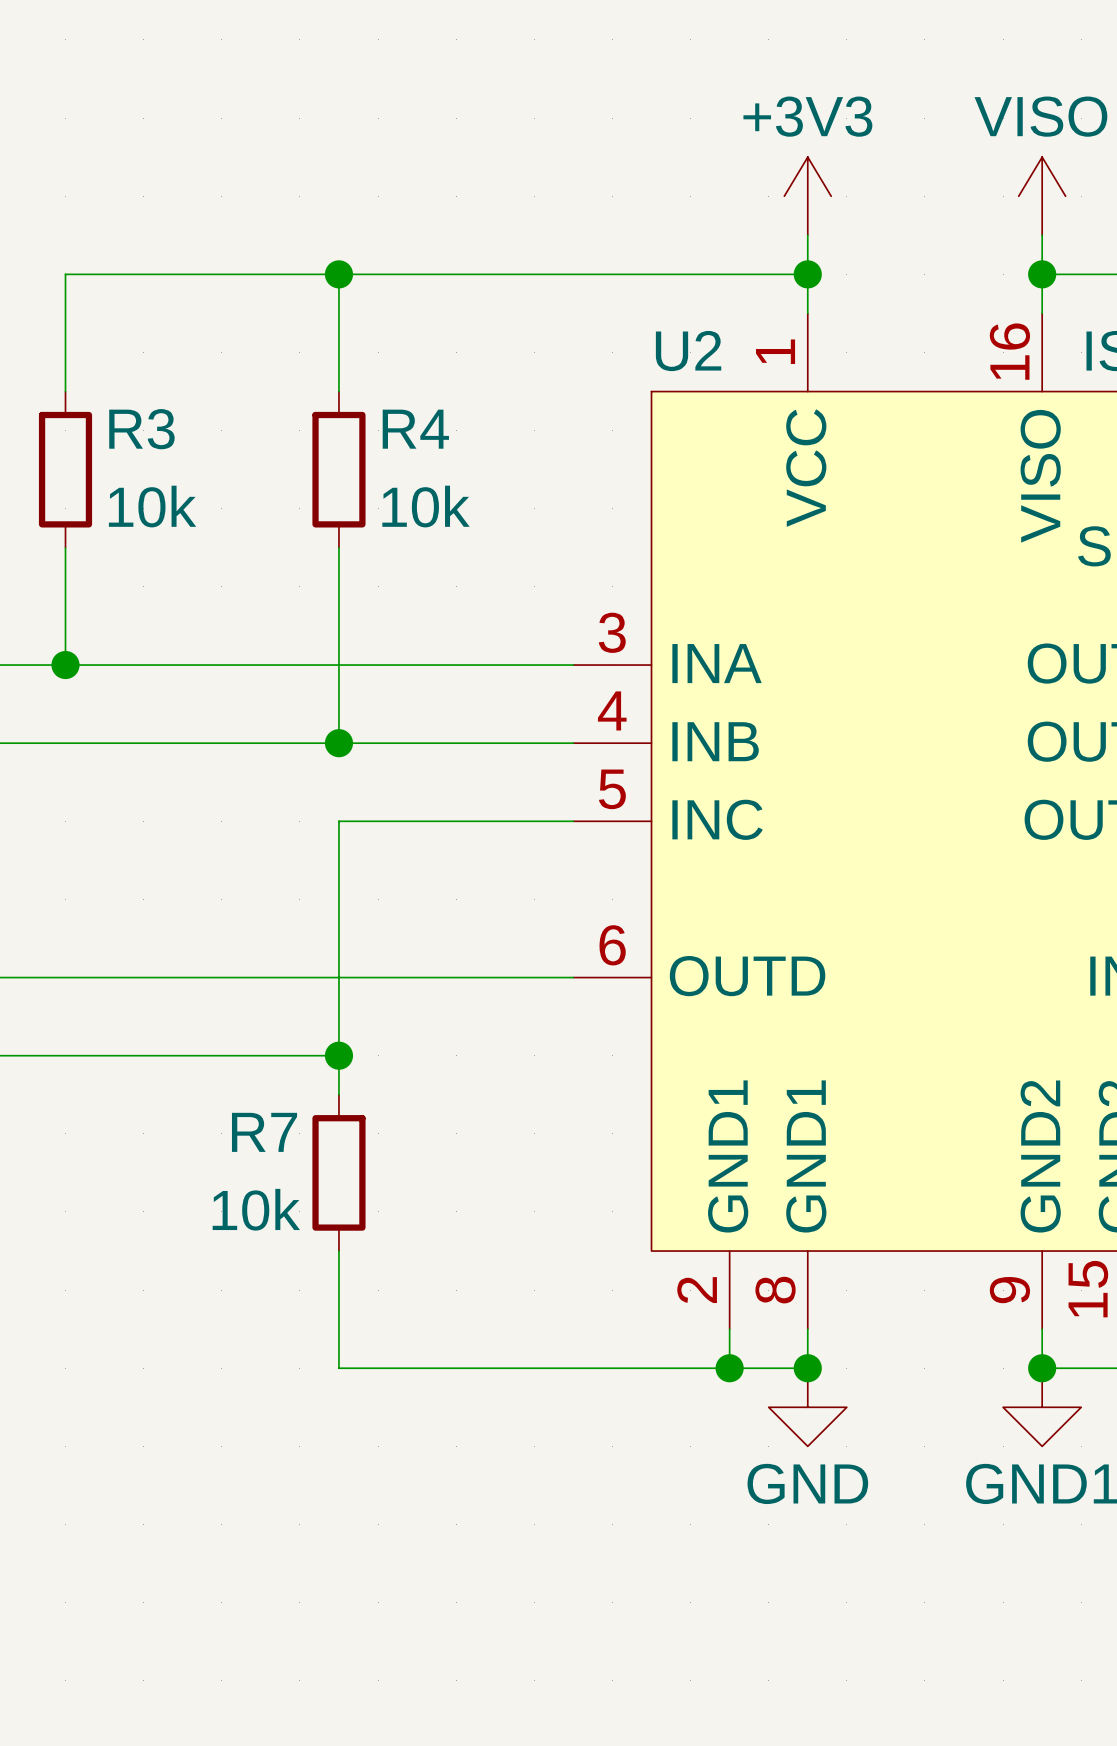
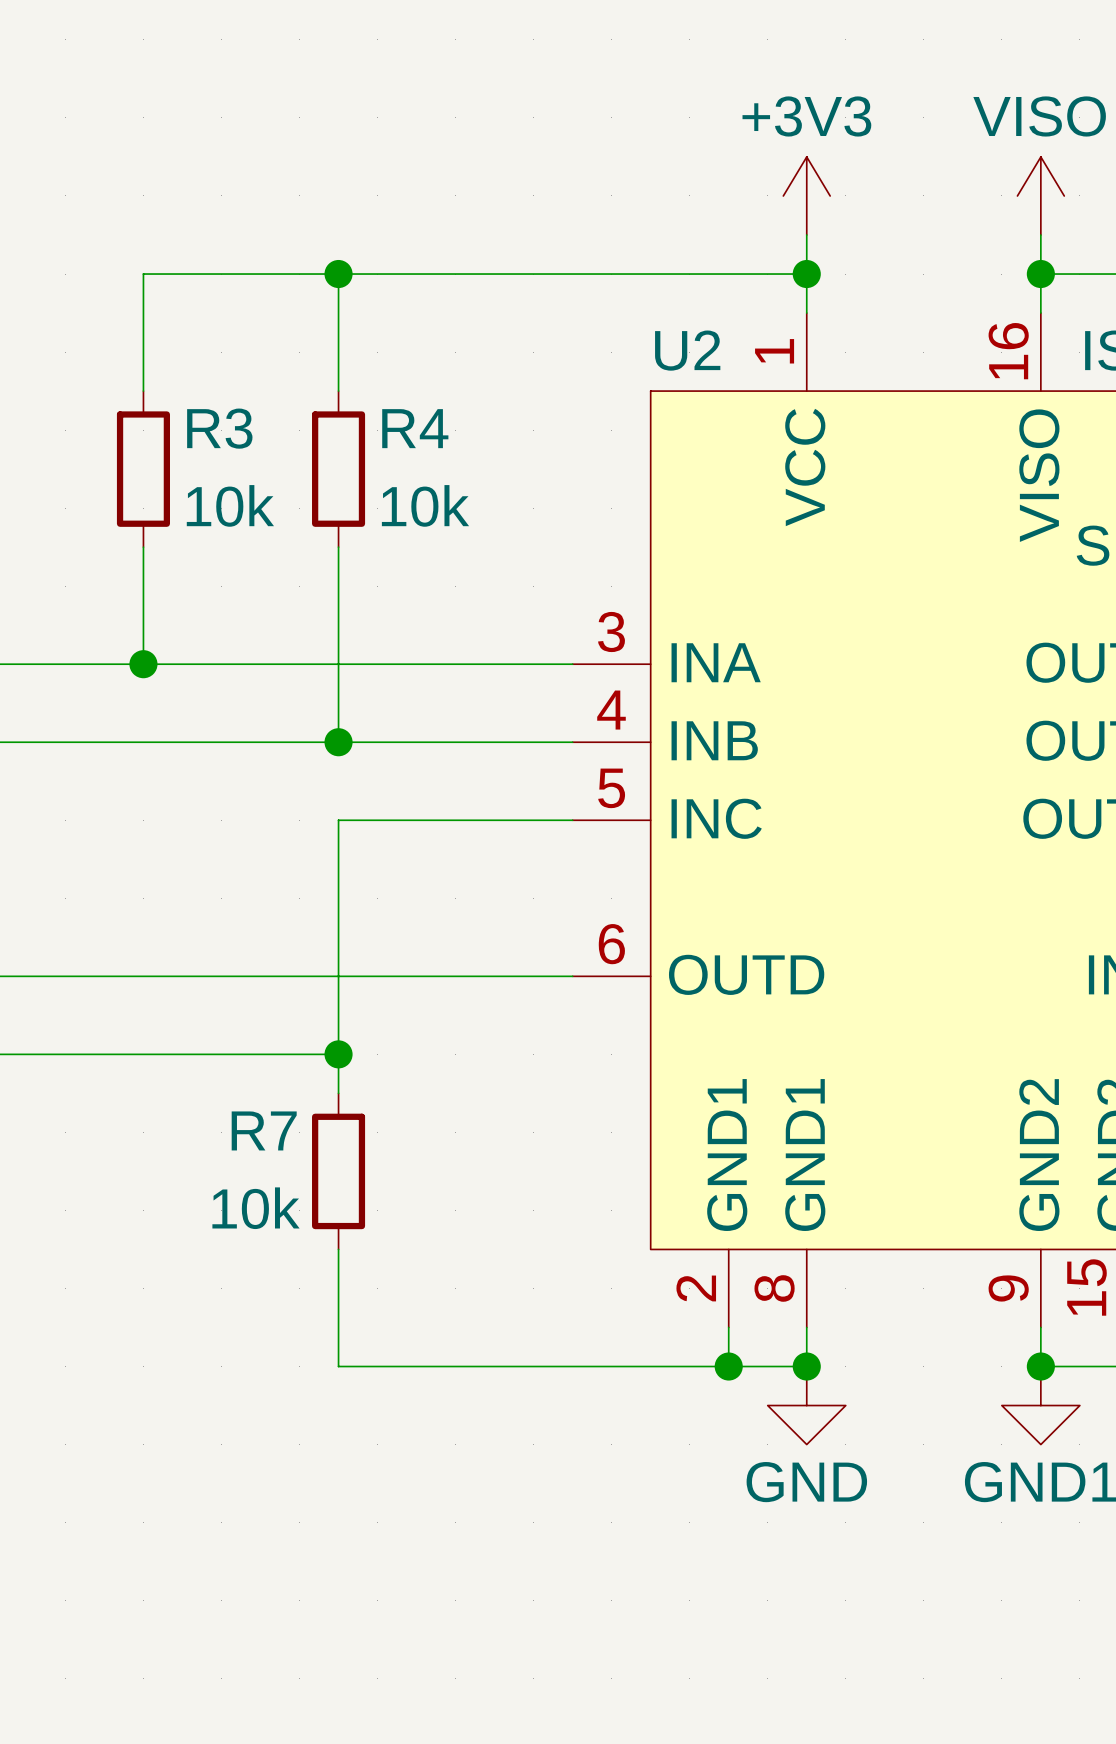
wire: (143, 274) (65, 274) (65, 391) -> (143, 274) (143, 391)
R3 position: (65, 469) -> (143, 469)
wire: (65, 547) (65, 665) -> (143, 547) (143, 664)
junction position: (65, 665) -> (143, 664)

